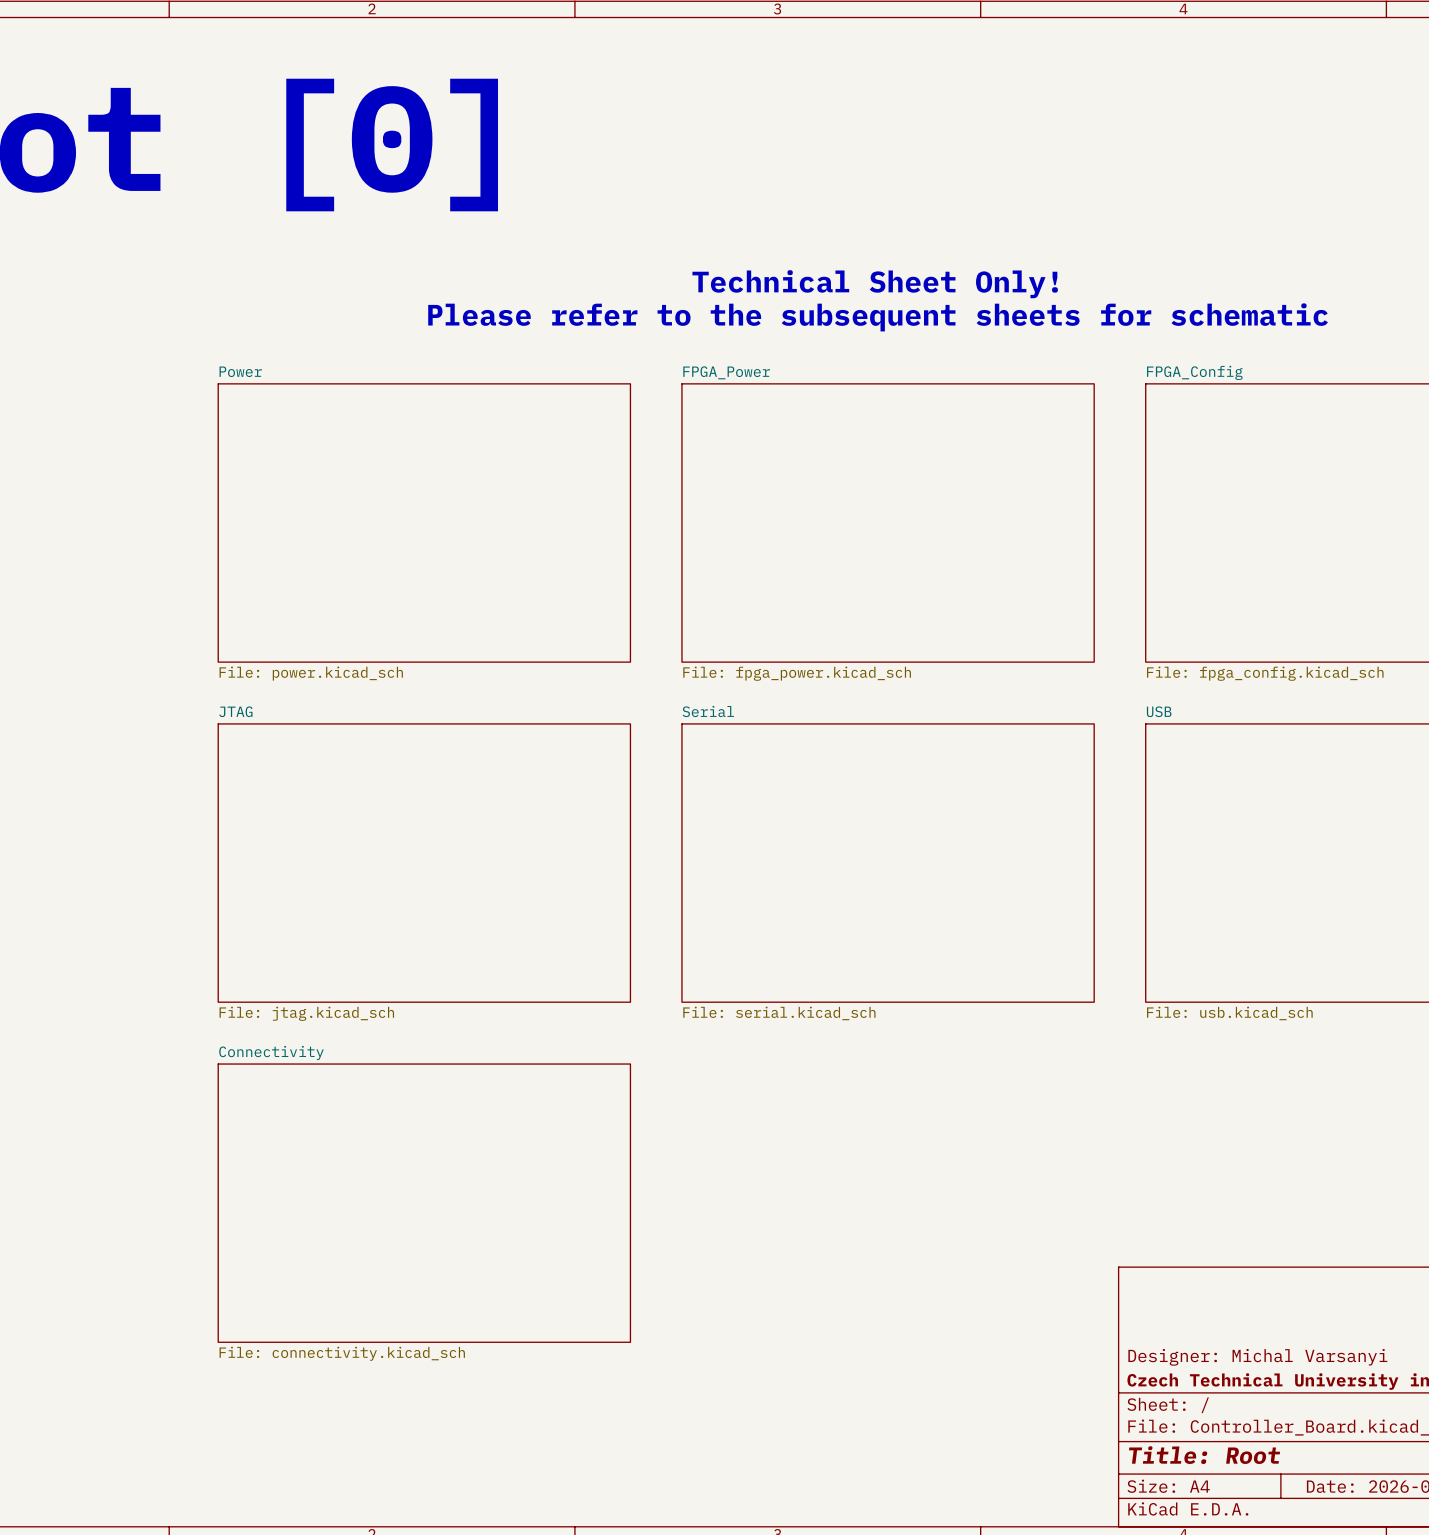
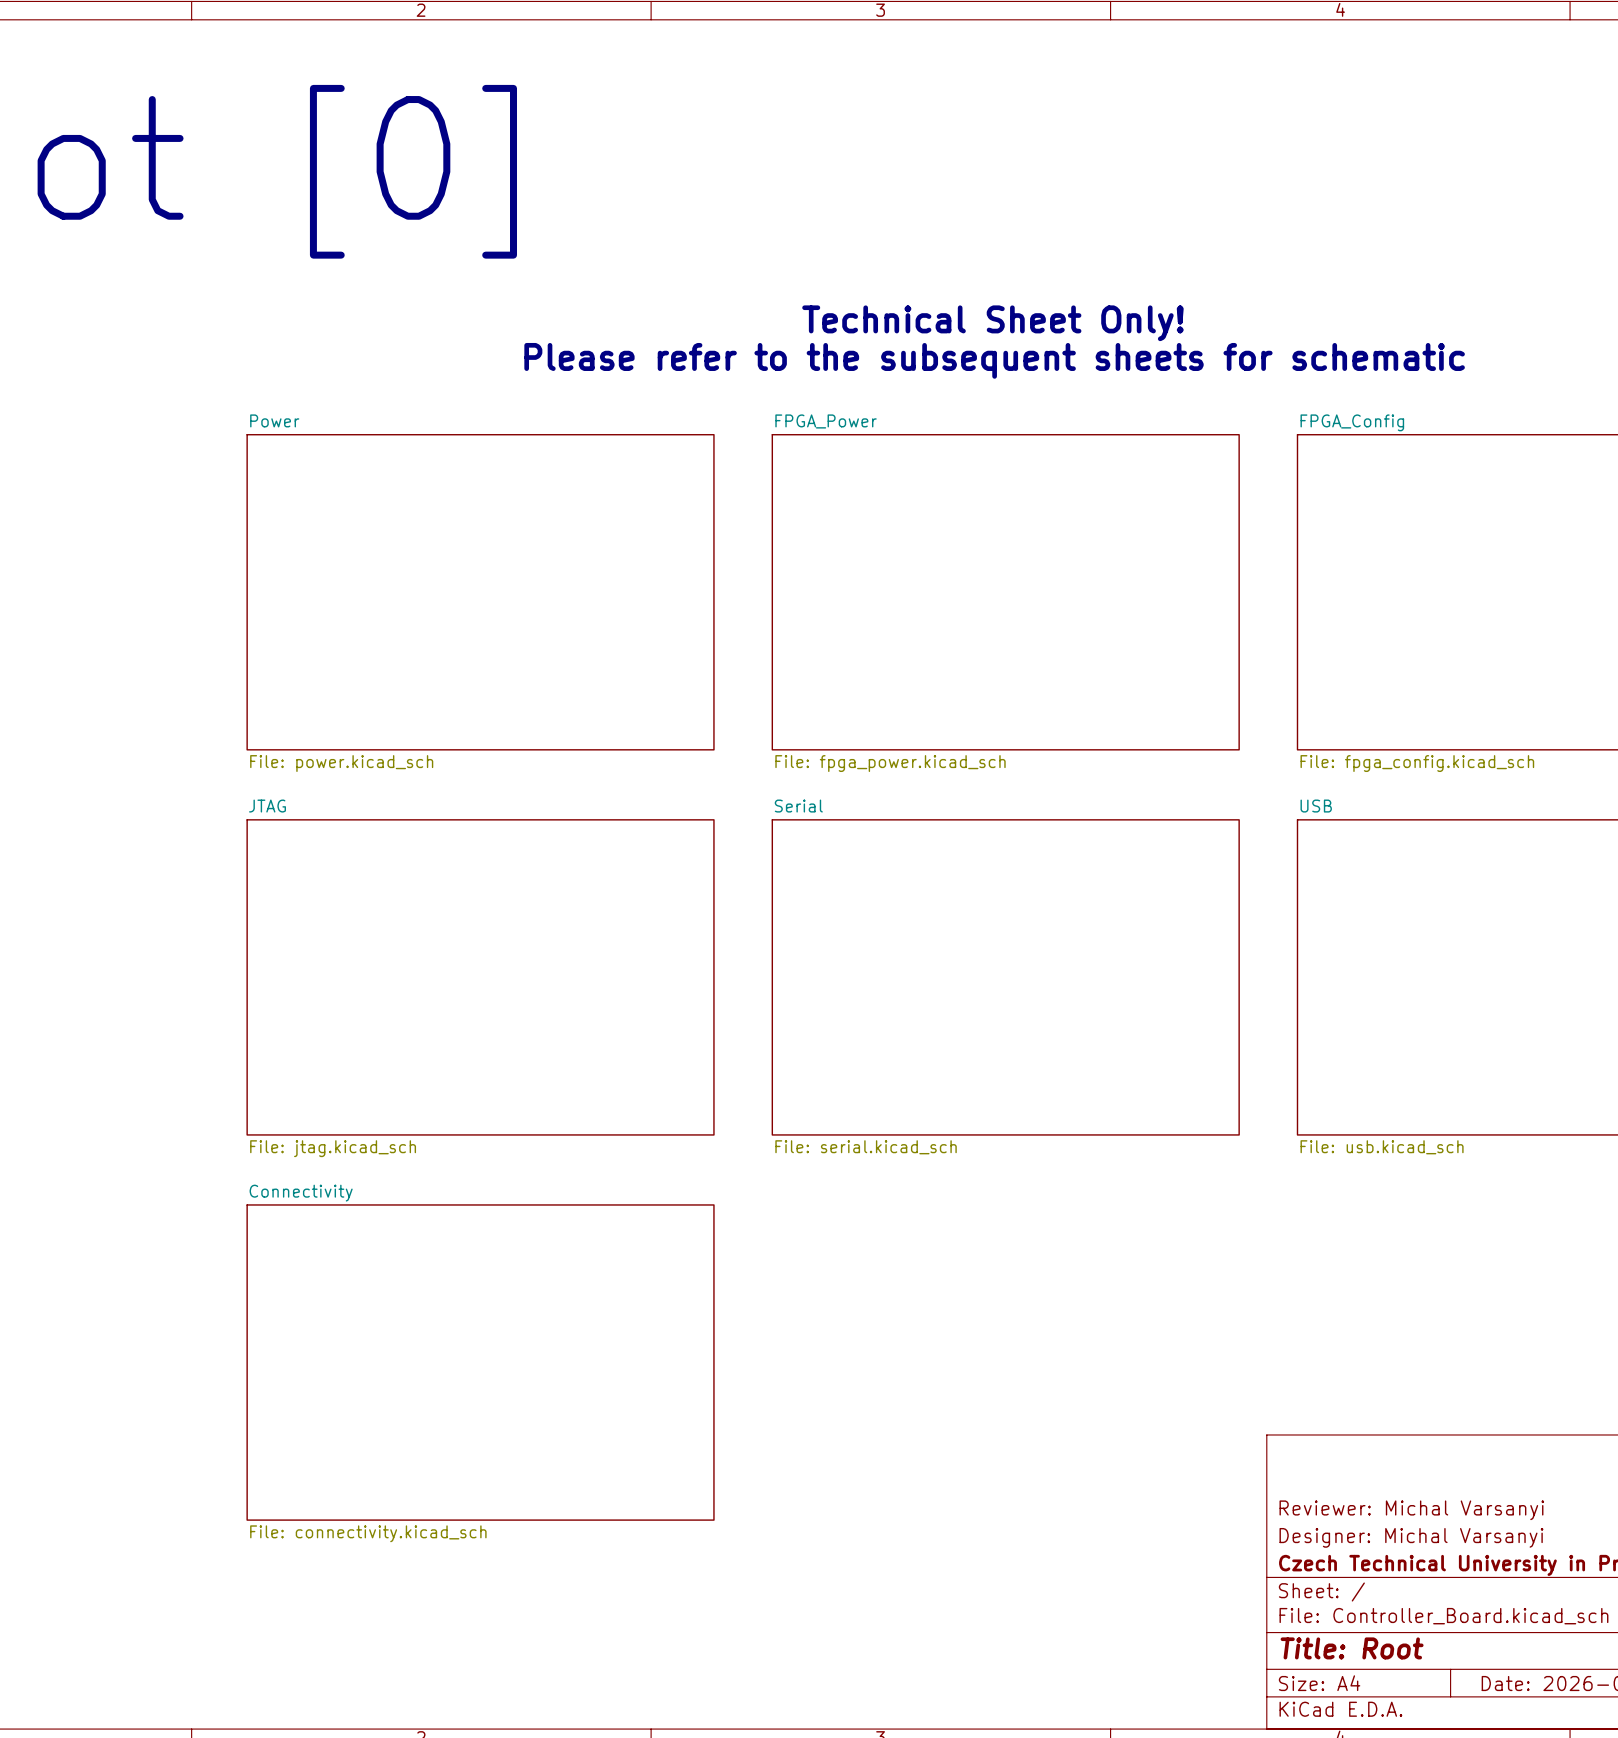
title block: none -> Reviewer: Michal Varsanyi (1411, 1510)

